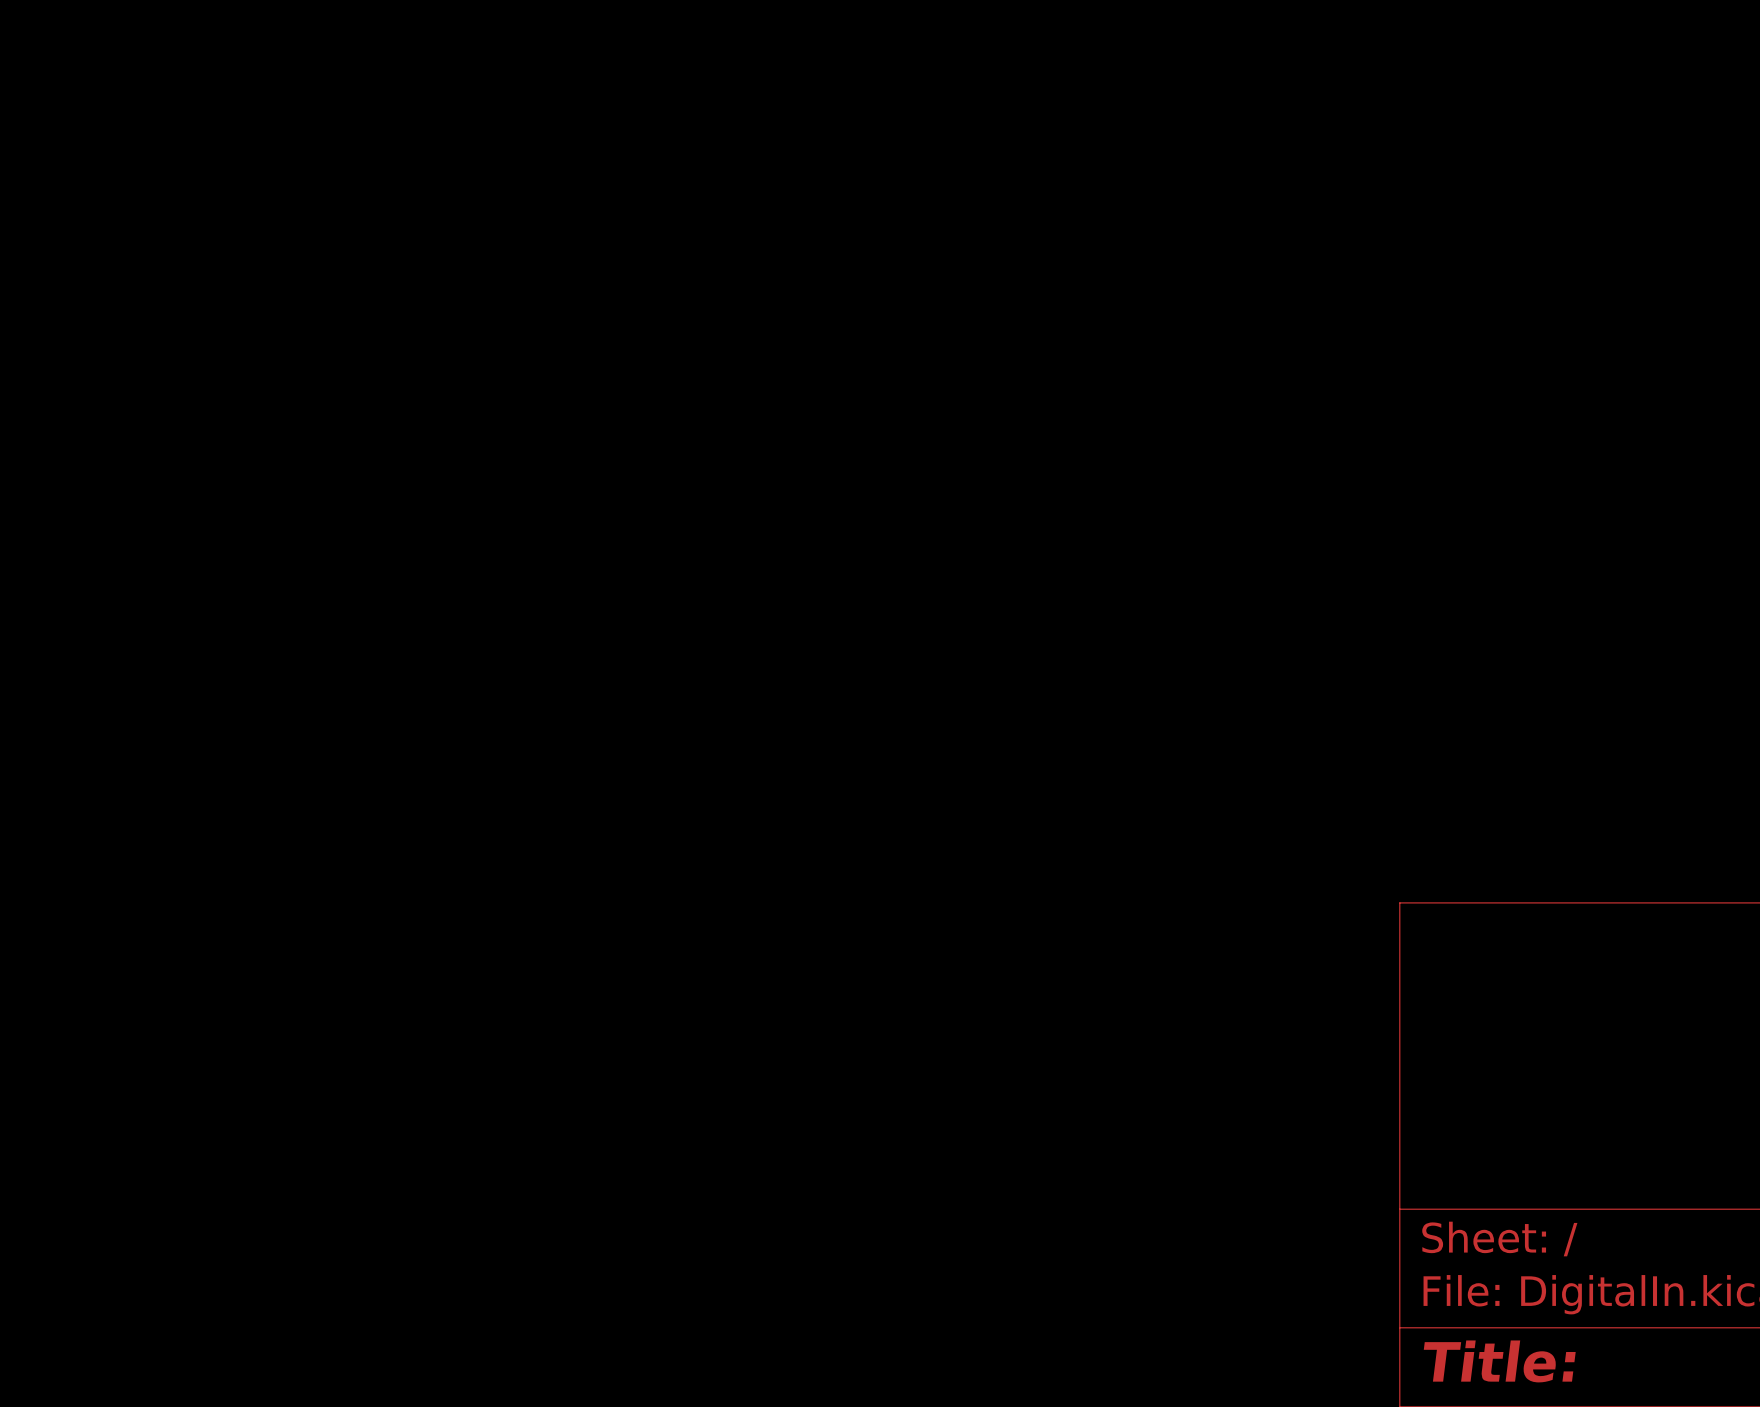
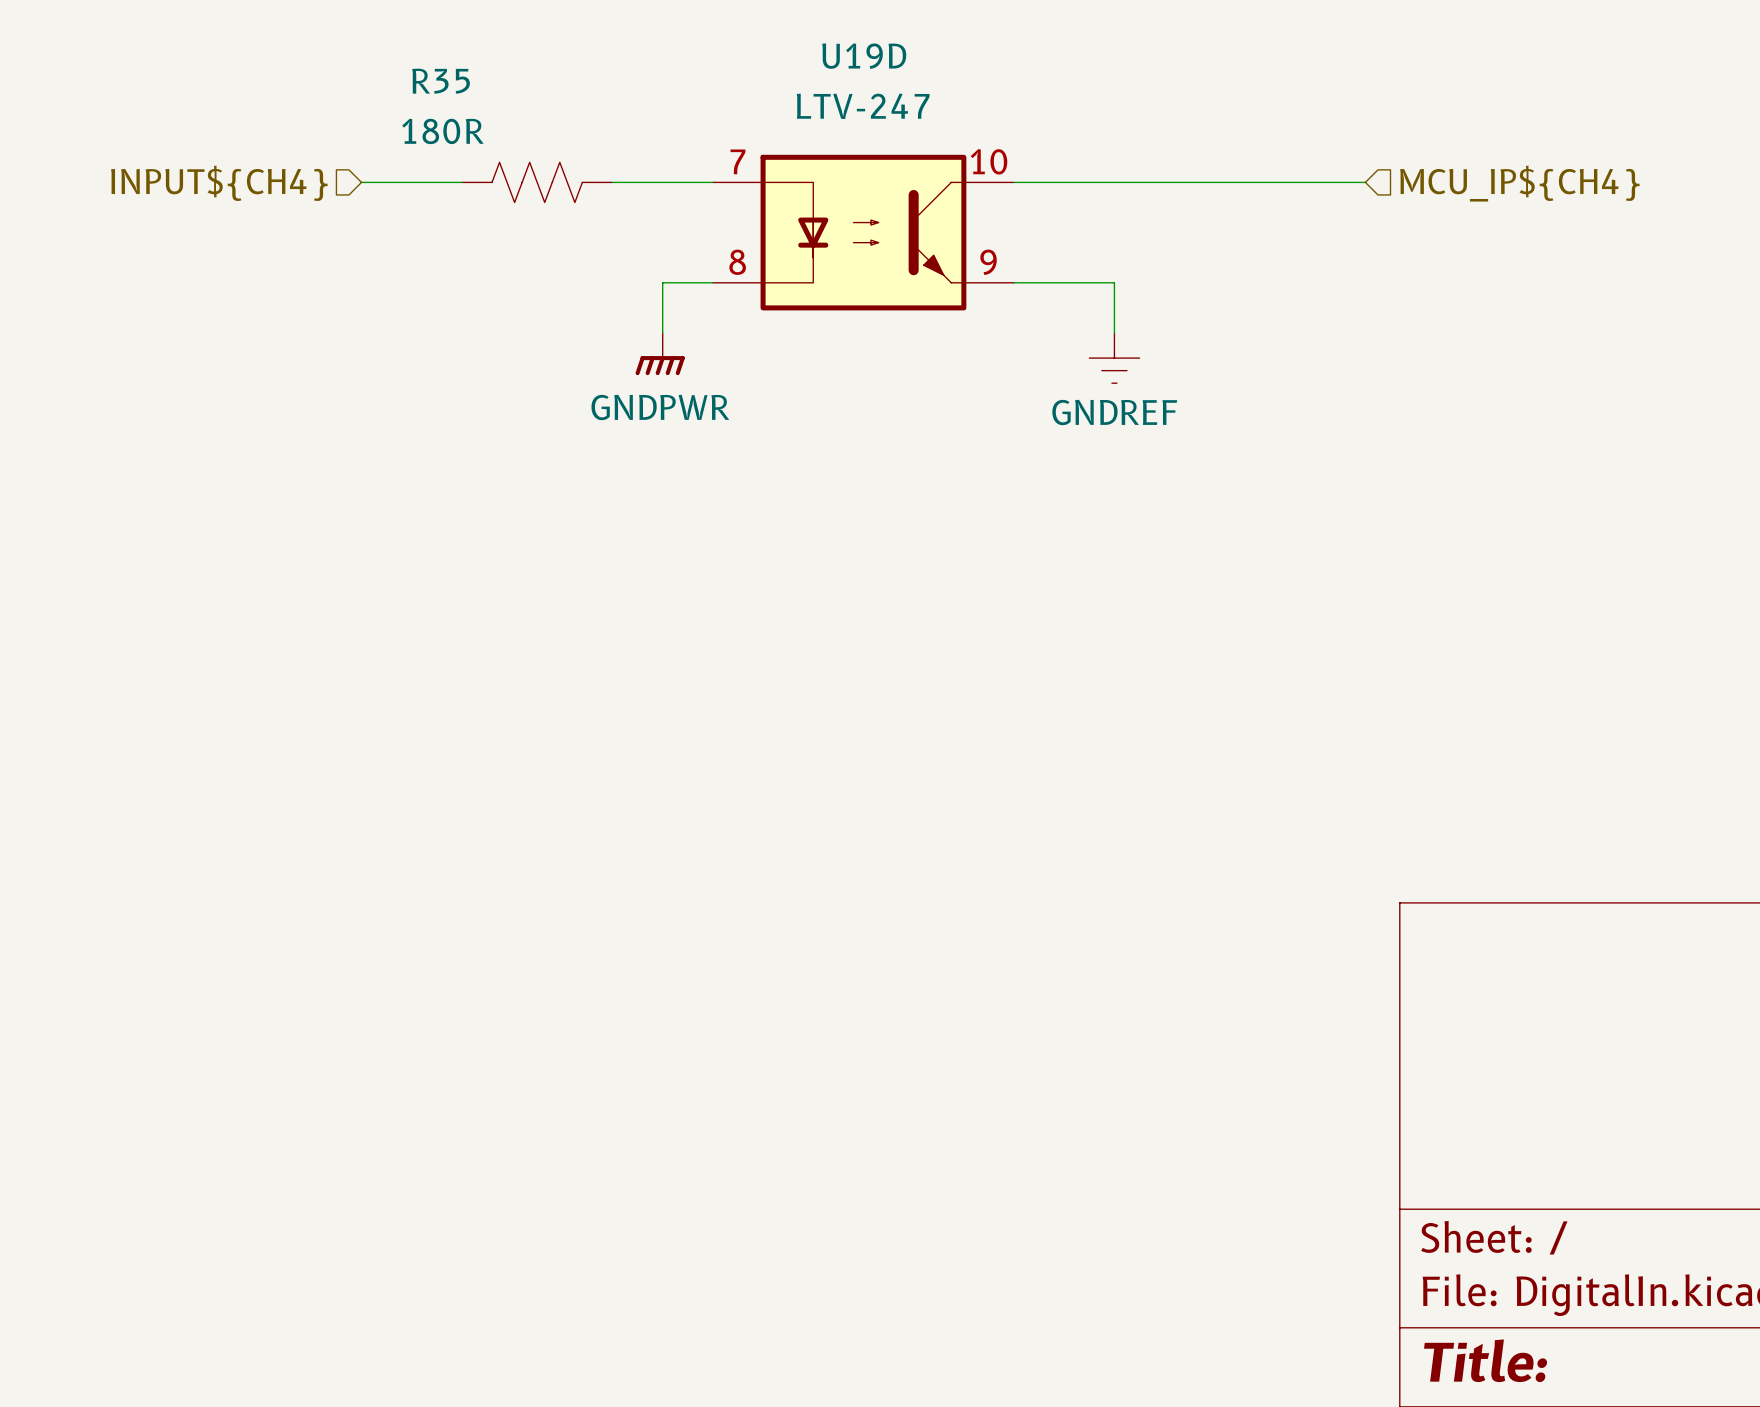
wire: none -> (361, 182) (461, 182)
R35: none -> 180R (537, 182)
wire: none -> (612, 182) (712, 182)
wire: none -> (1014, 182) (1365, 182)
hierarchical label: none -> INPUT${CH4} (219, 183)
hierarchical label: none -> MCU_IP${CH4} (1519, 183)
U19D: none -> LTV-247 (863, 232)
wire: none -> (712, 282) (662, 282) (662, 332)
wire: none -> (1014, 282) (1114, 282) (1114, 332)
power symbol: none -> GNDPWR (660, 354)
power symbol: none -> GNDREF (1114, 358)

